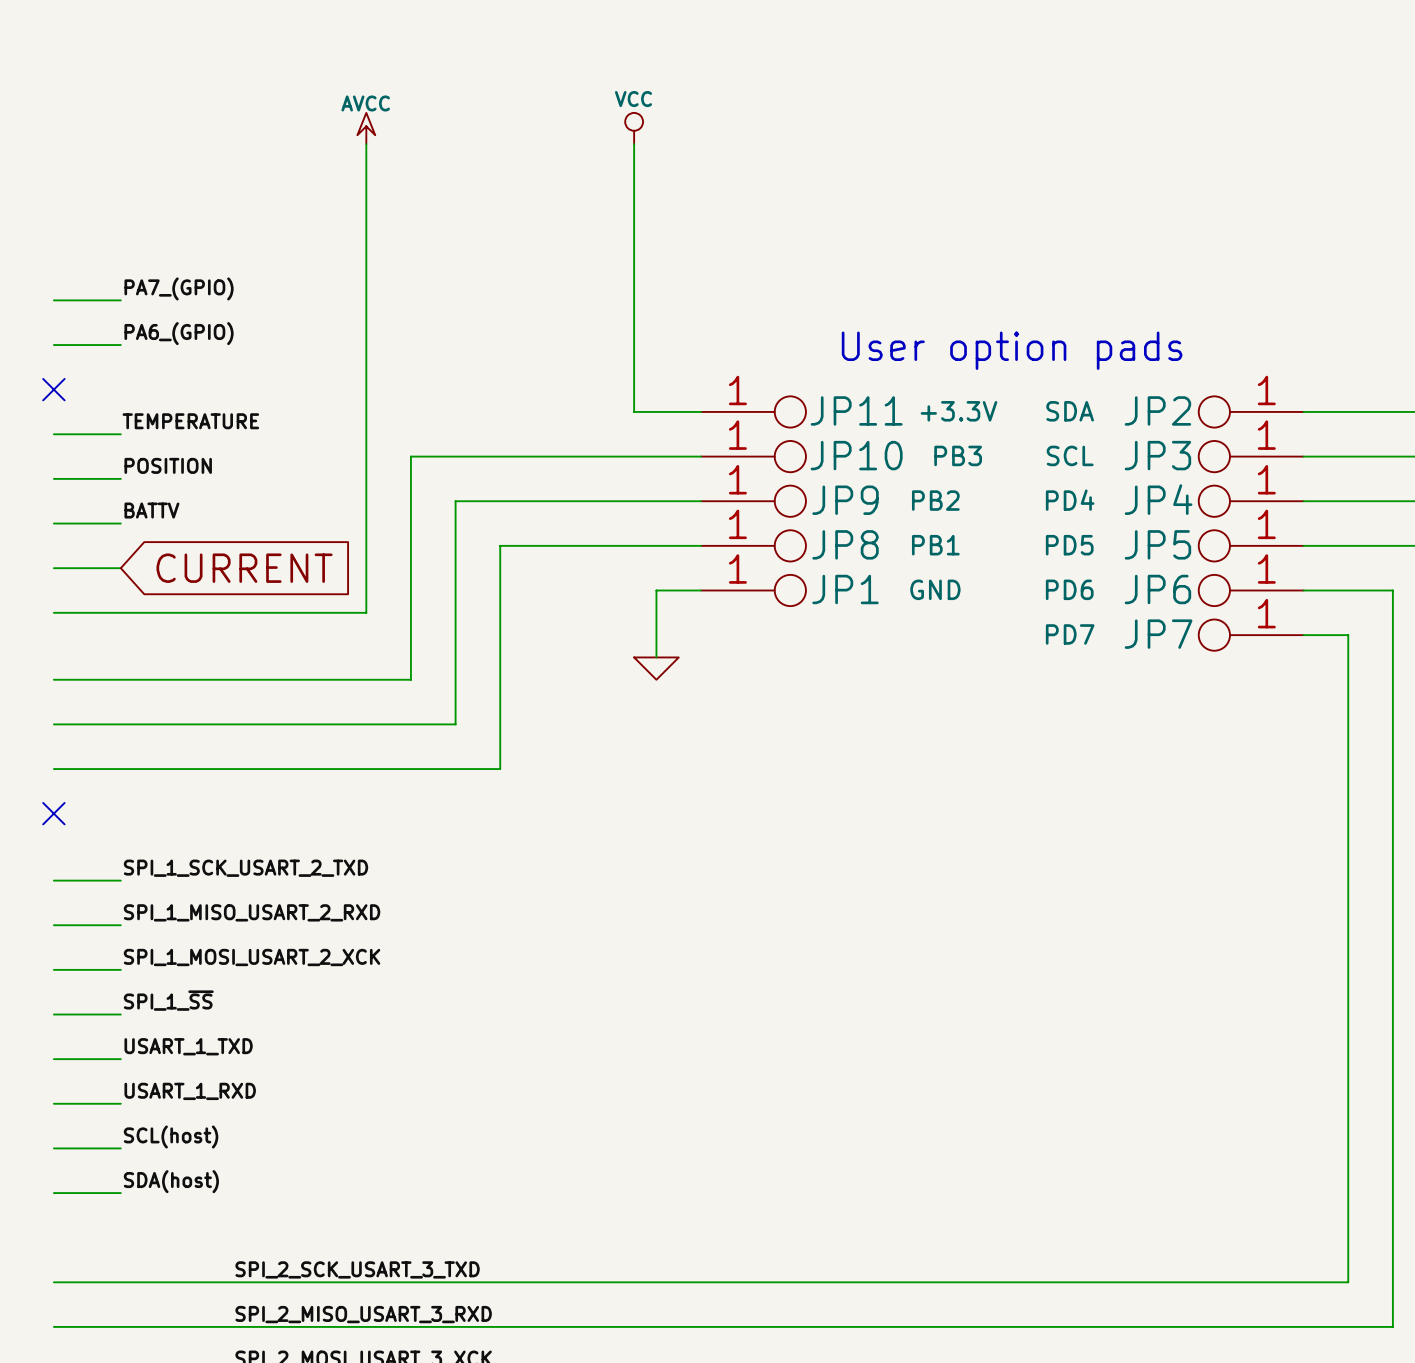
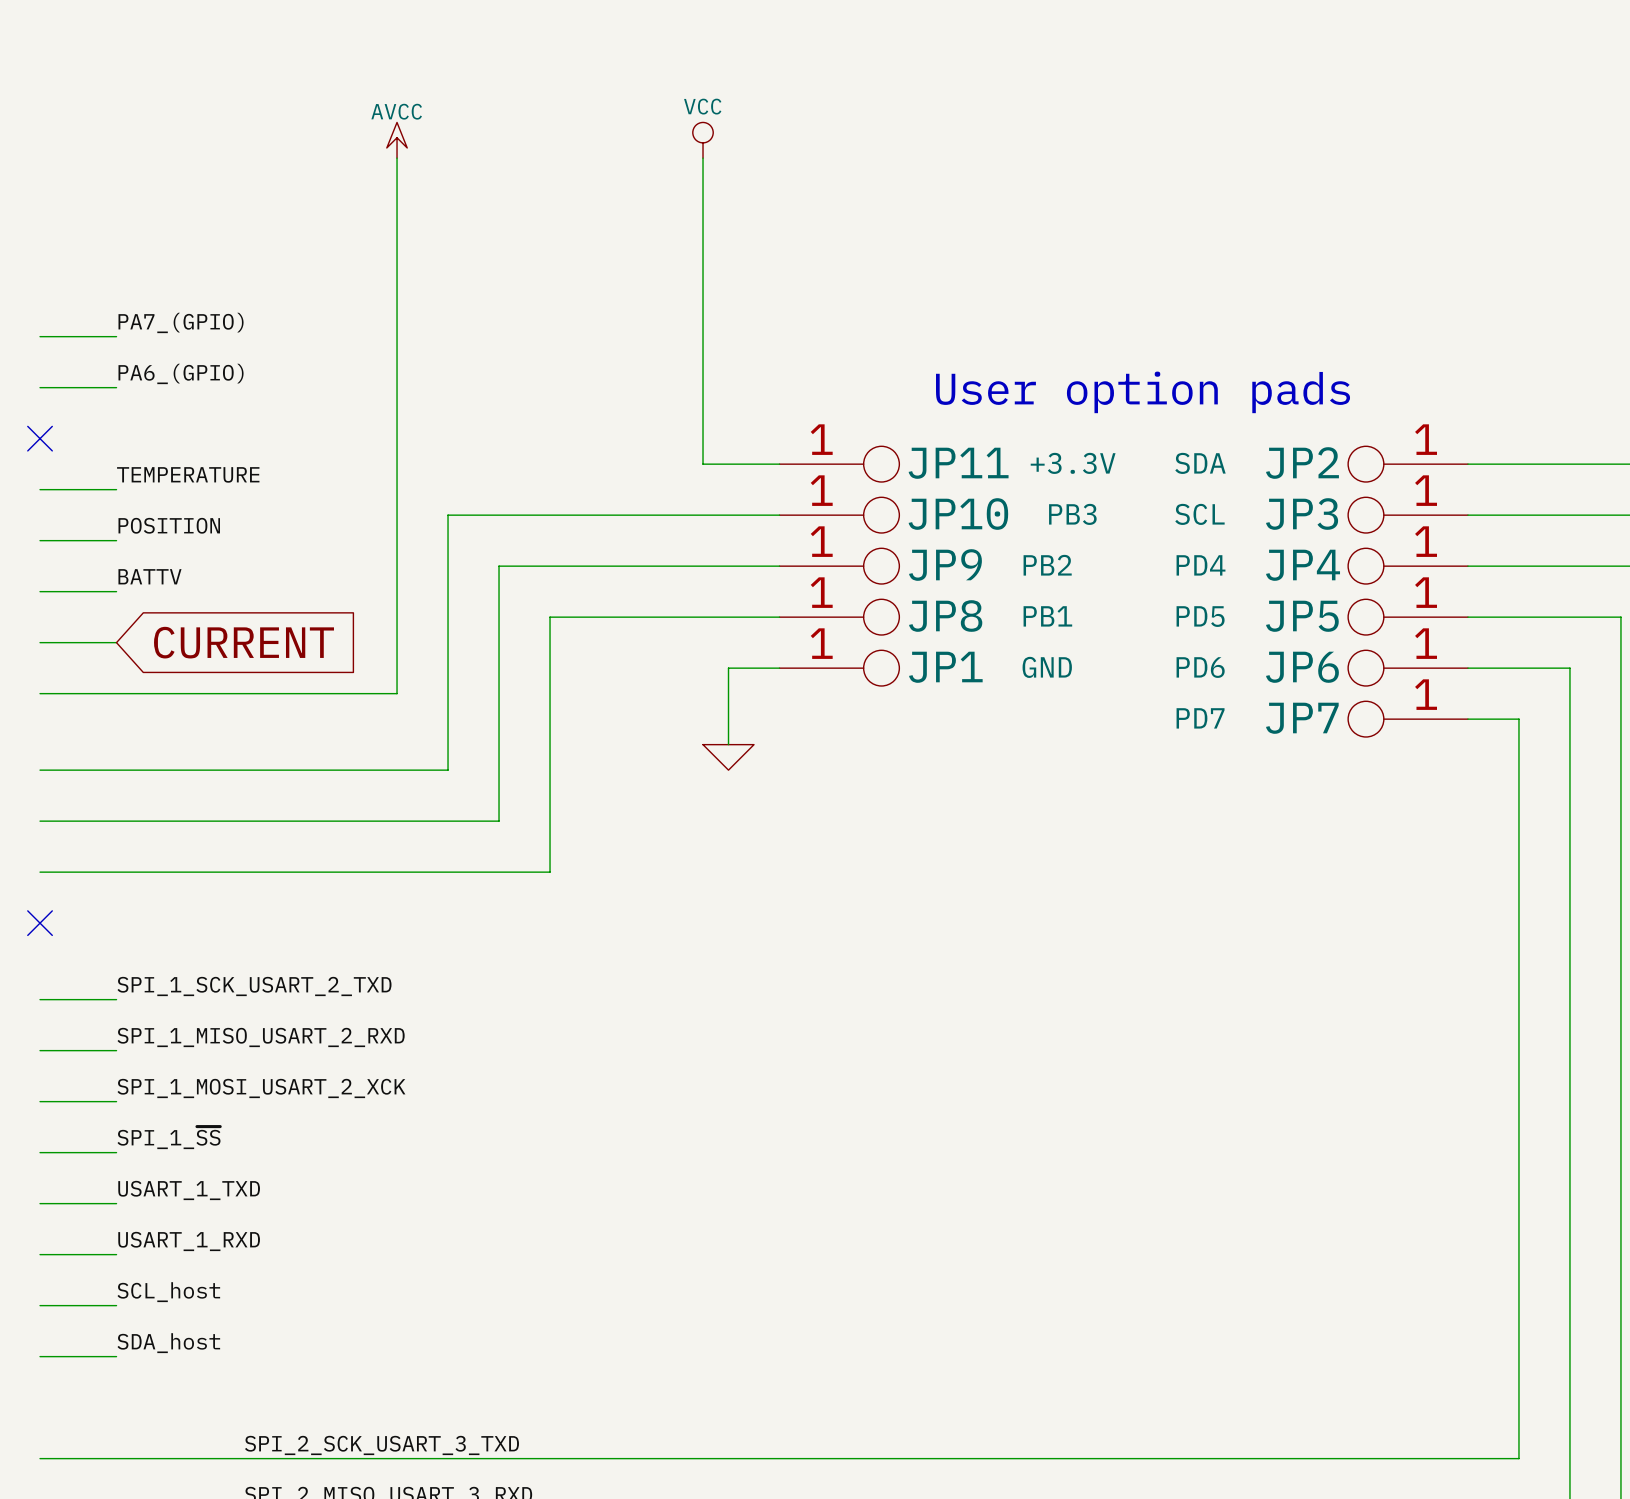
label: SCL(host) (171, 1136) -> SCL_host (168, 1292)
label: SDA(host) (171, 1181) -> SDA_host (168, 1343)

